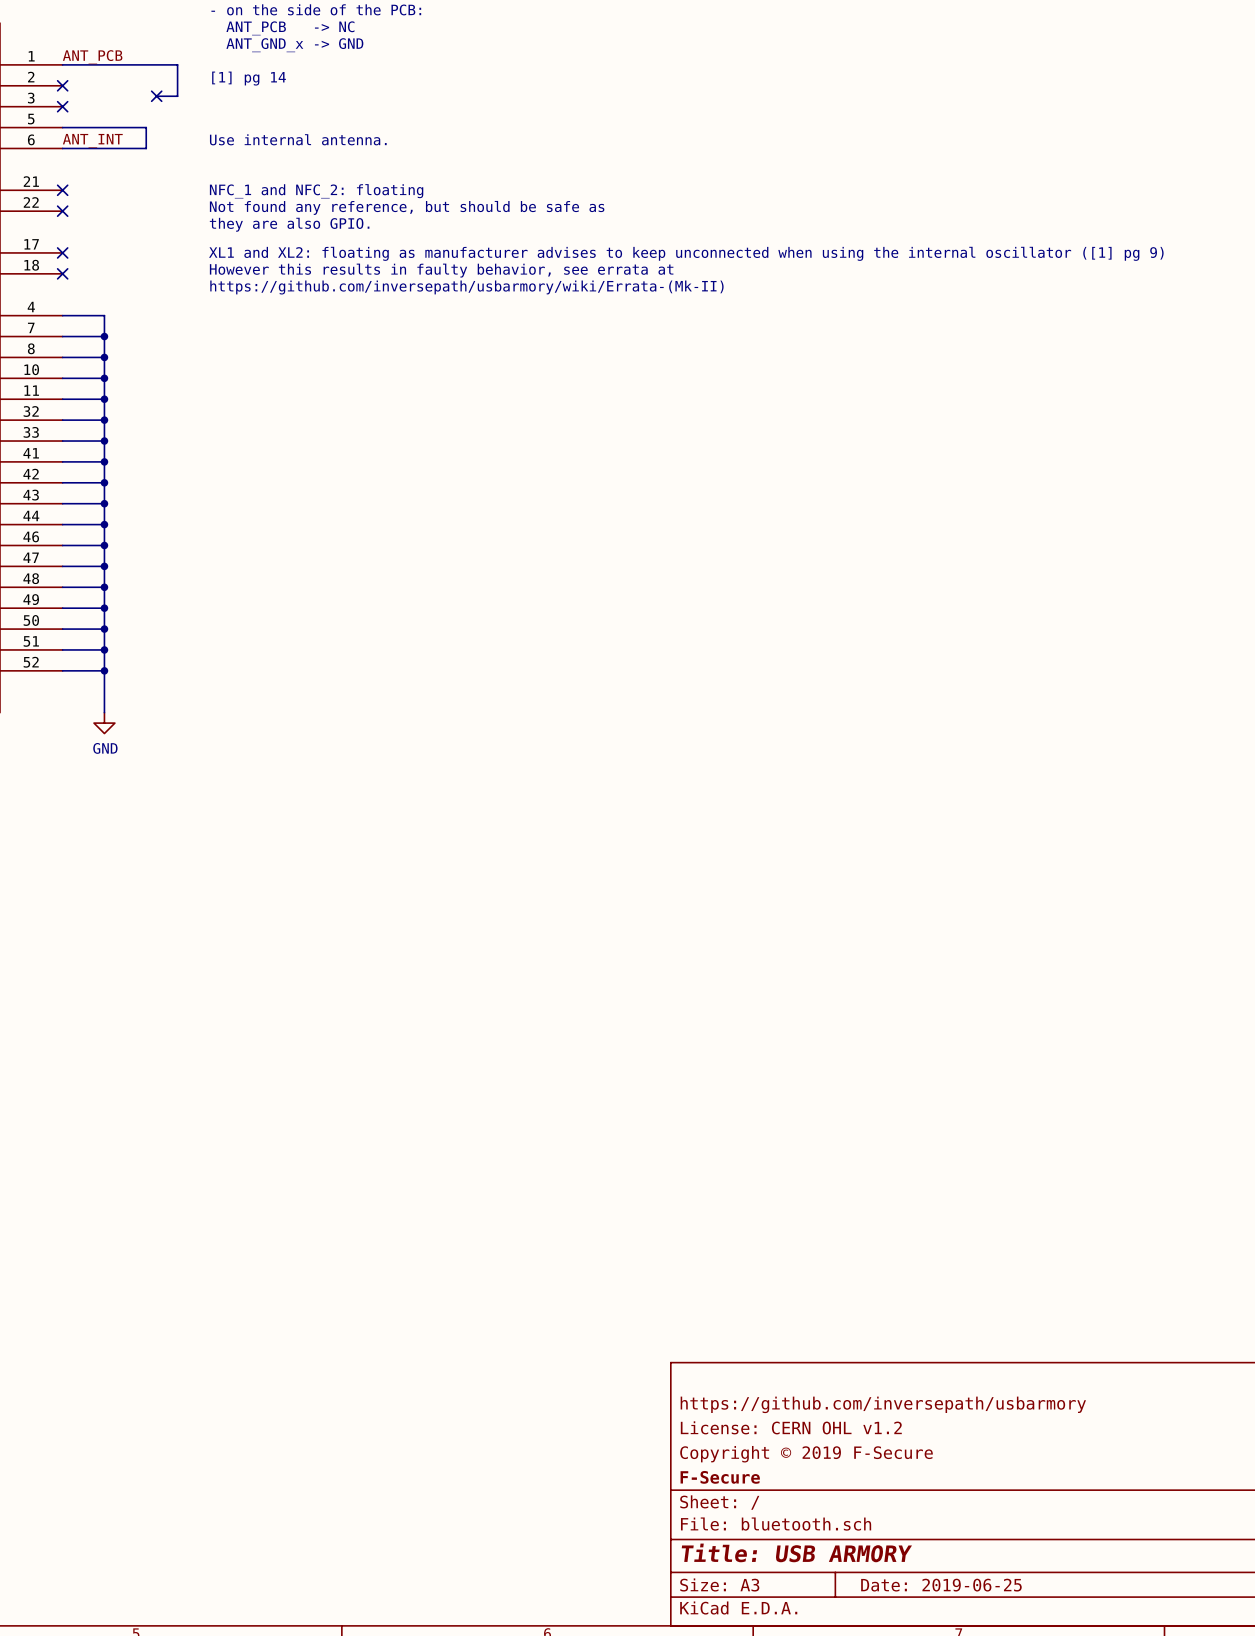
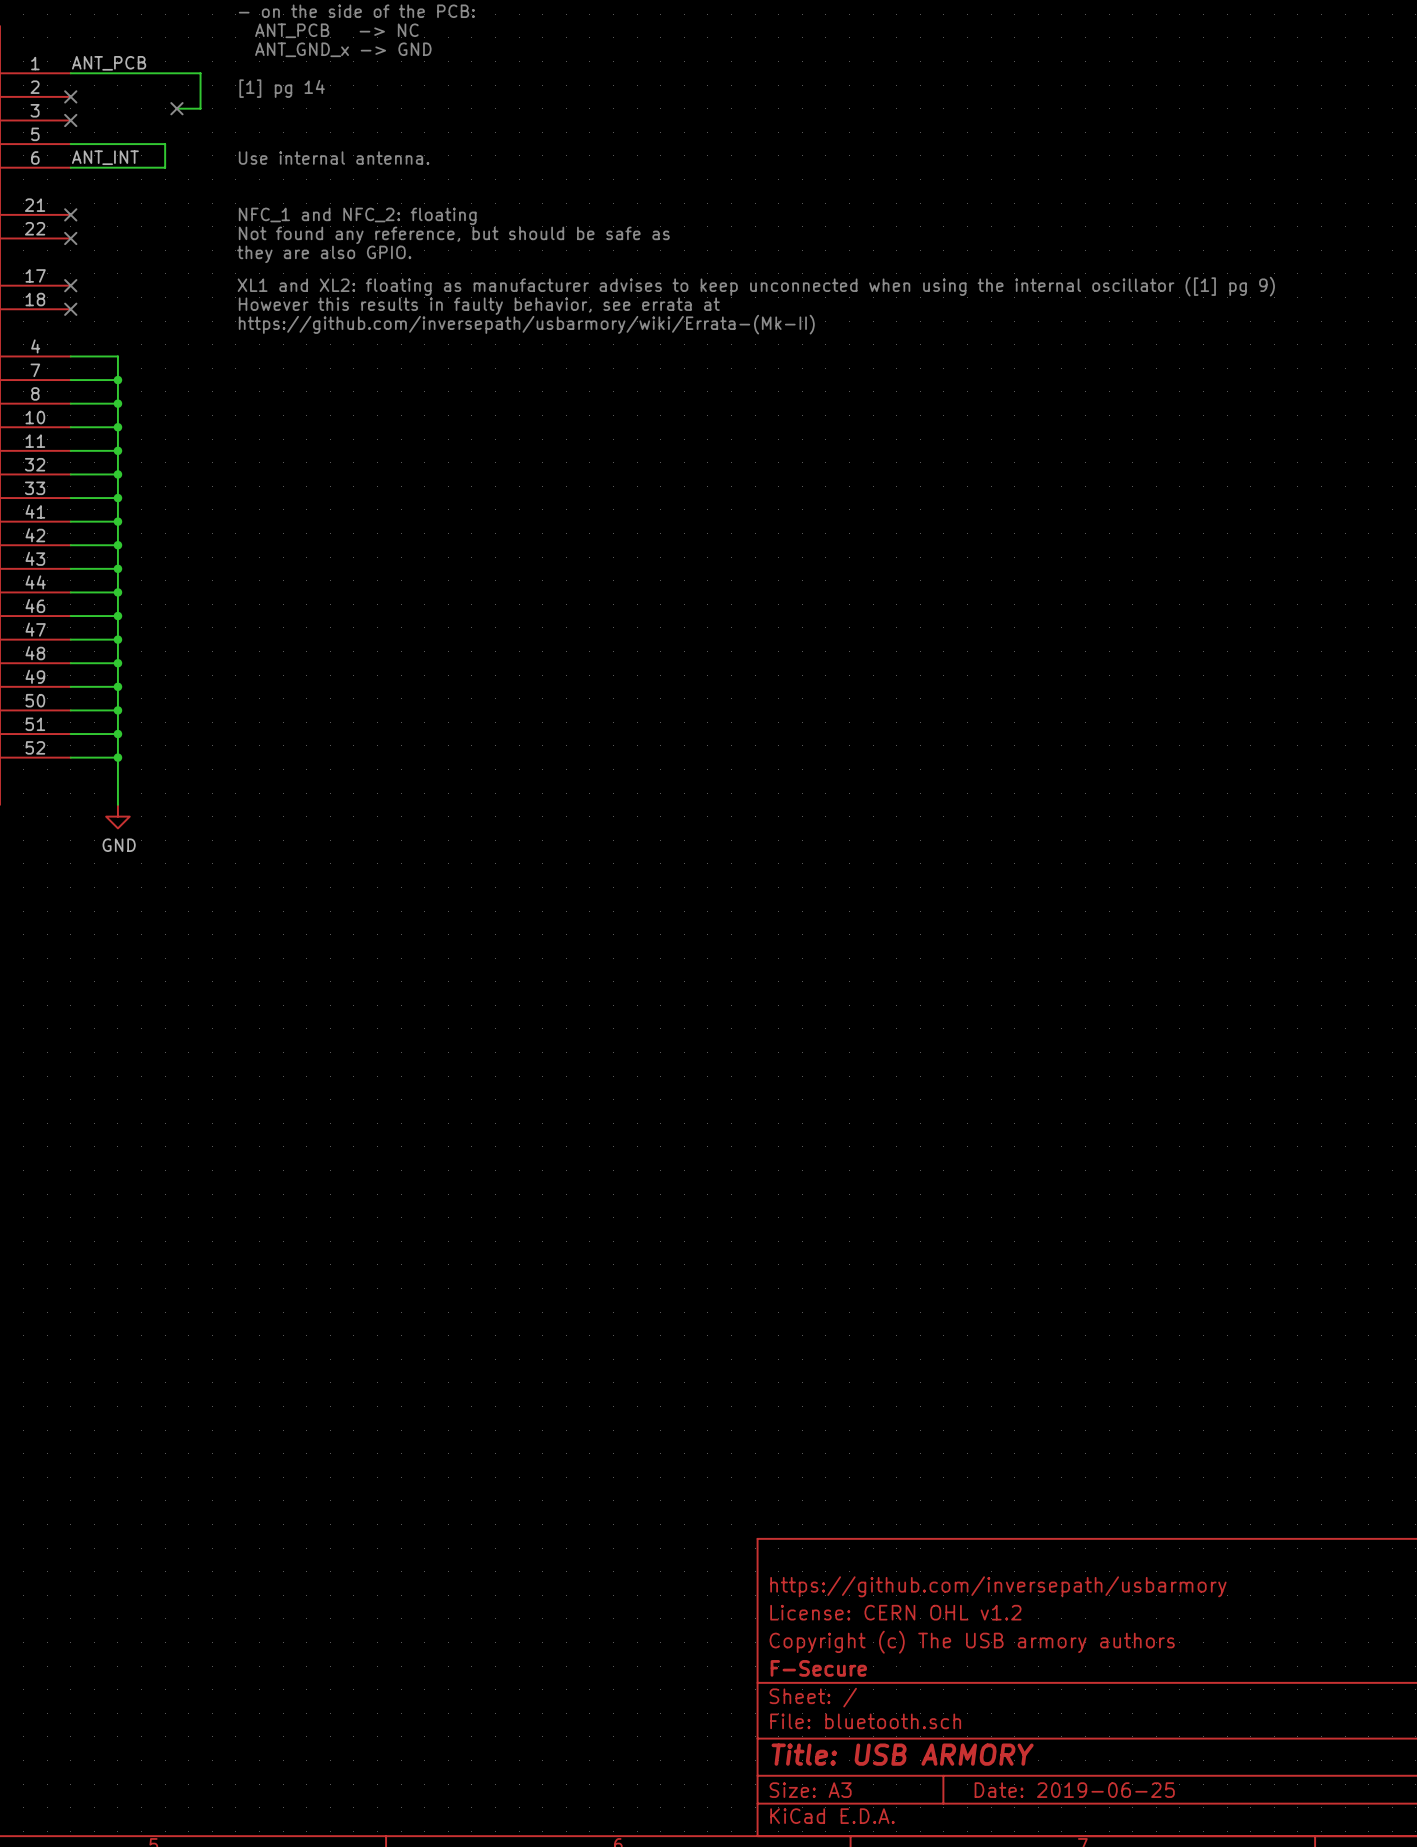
title block: Copyright © 2019 F-Secure (806, 1454) -> Copyright (c) The USB armory authors (972, 1642)

